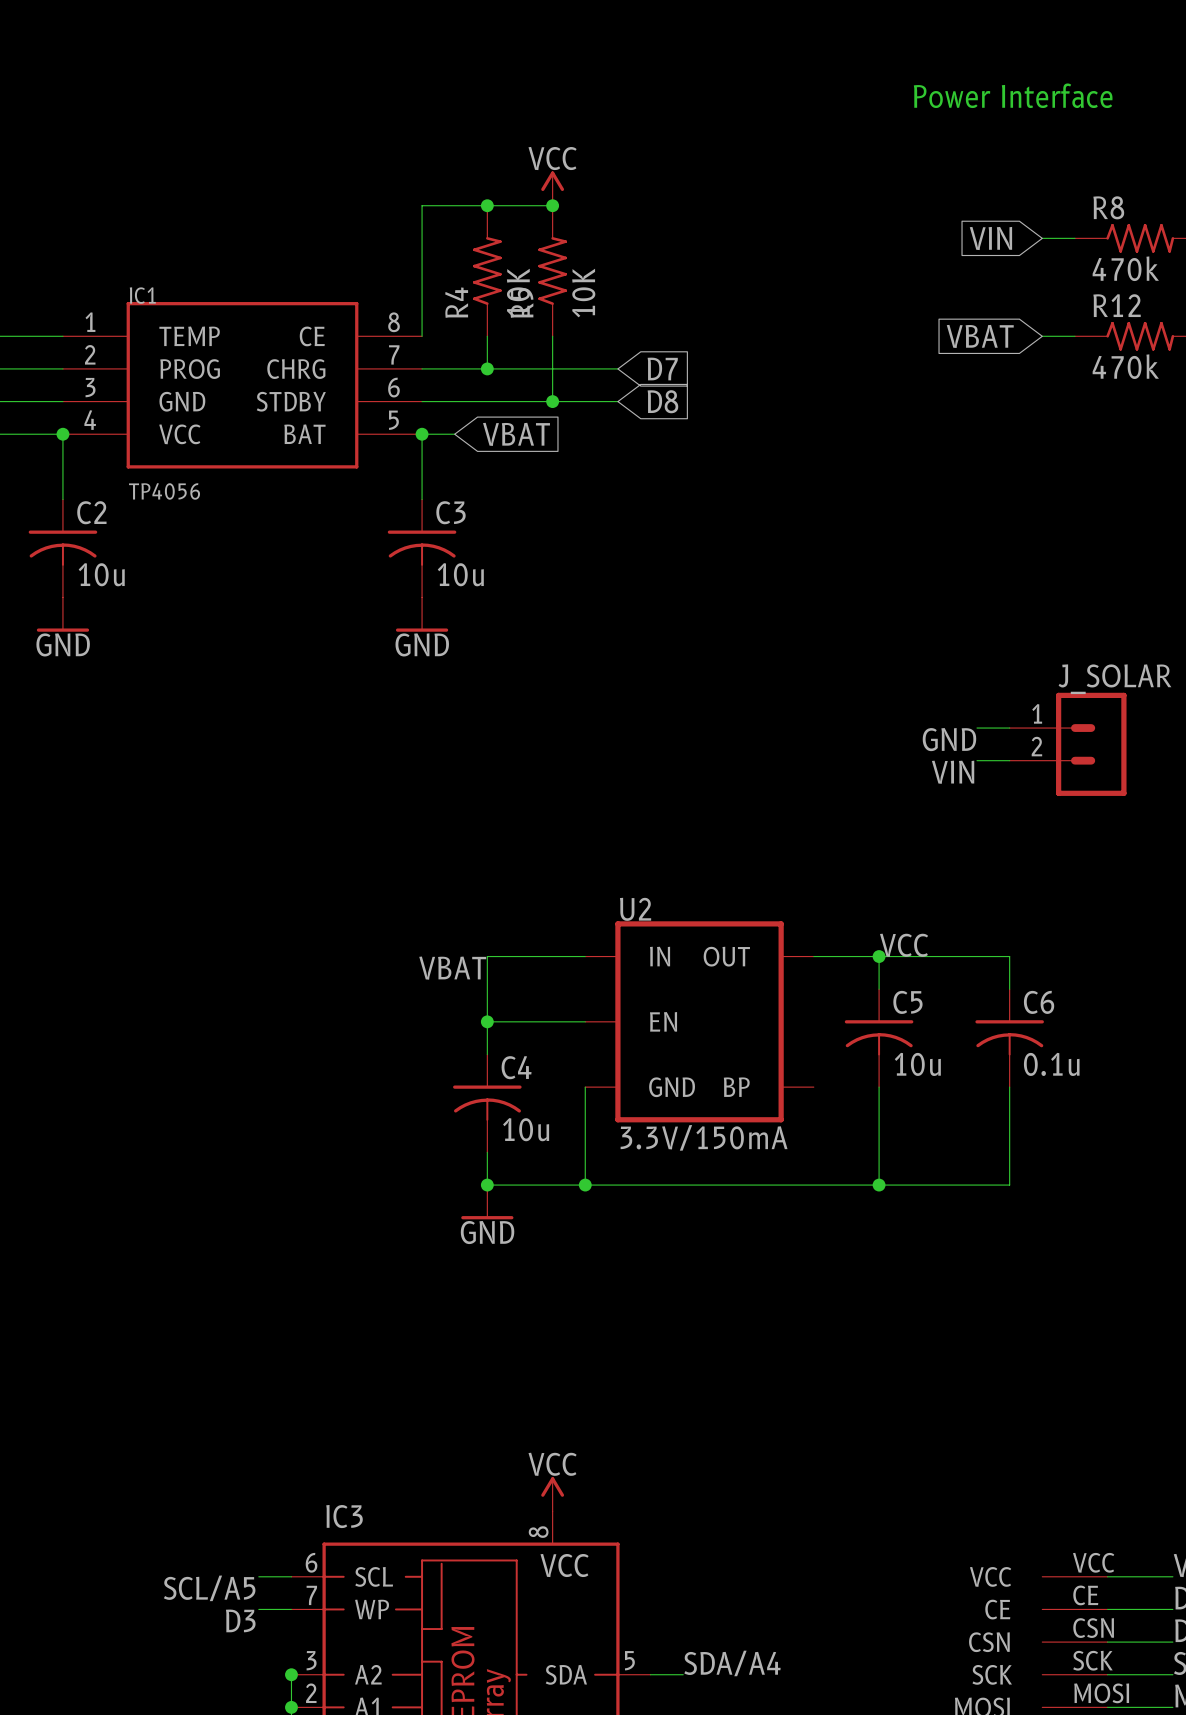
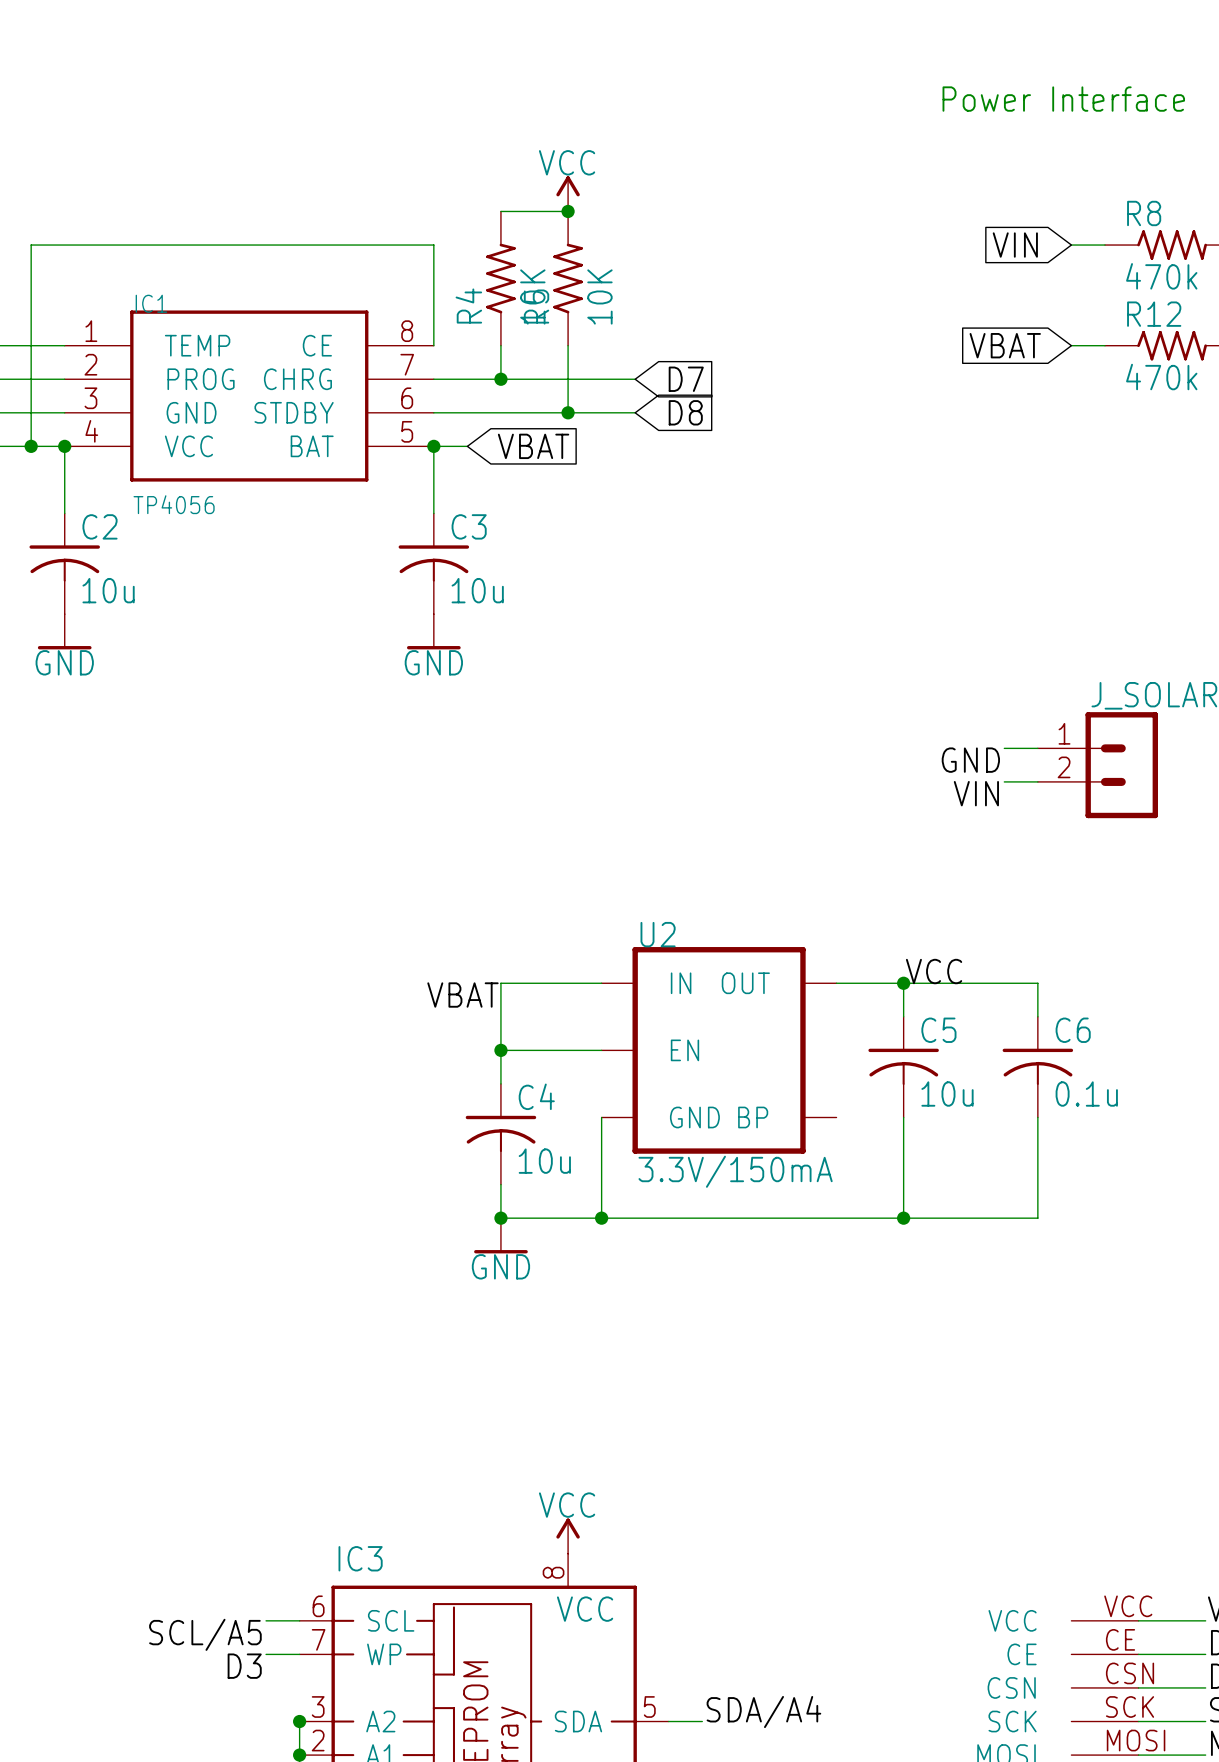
wire: (487, 205) (422, 205) (422, 238) -> (31, 446) (31, 245) (433, 245)
junction: (487, 205) -> none
junction: none -> (31, 446)

